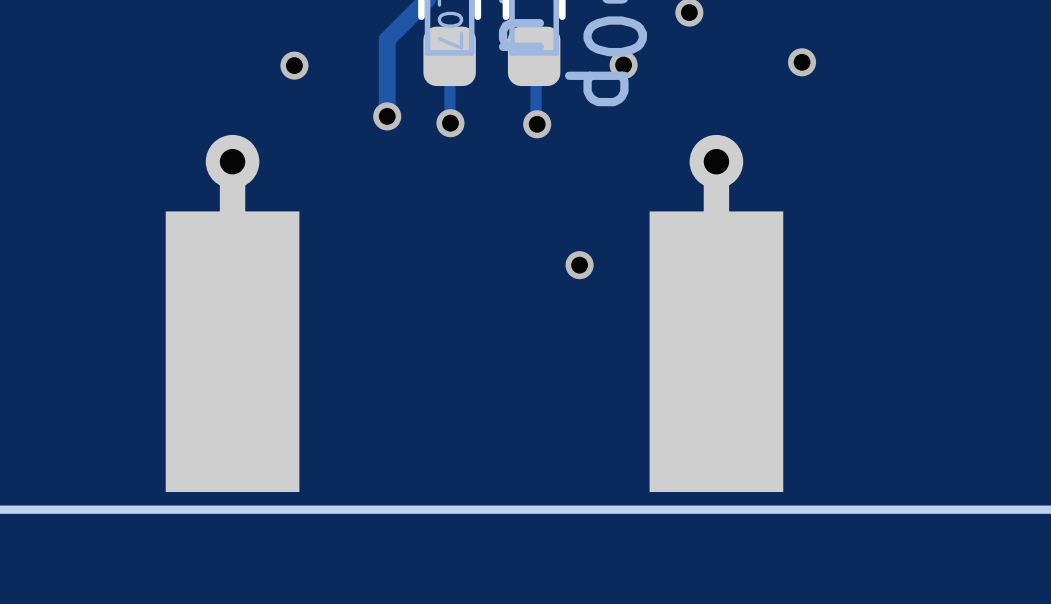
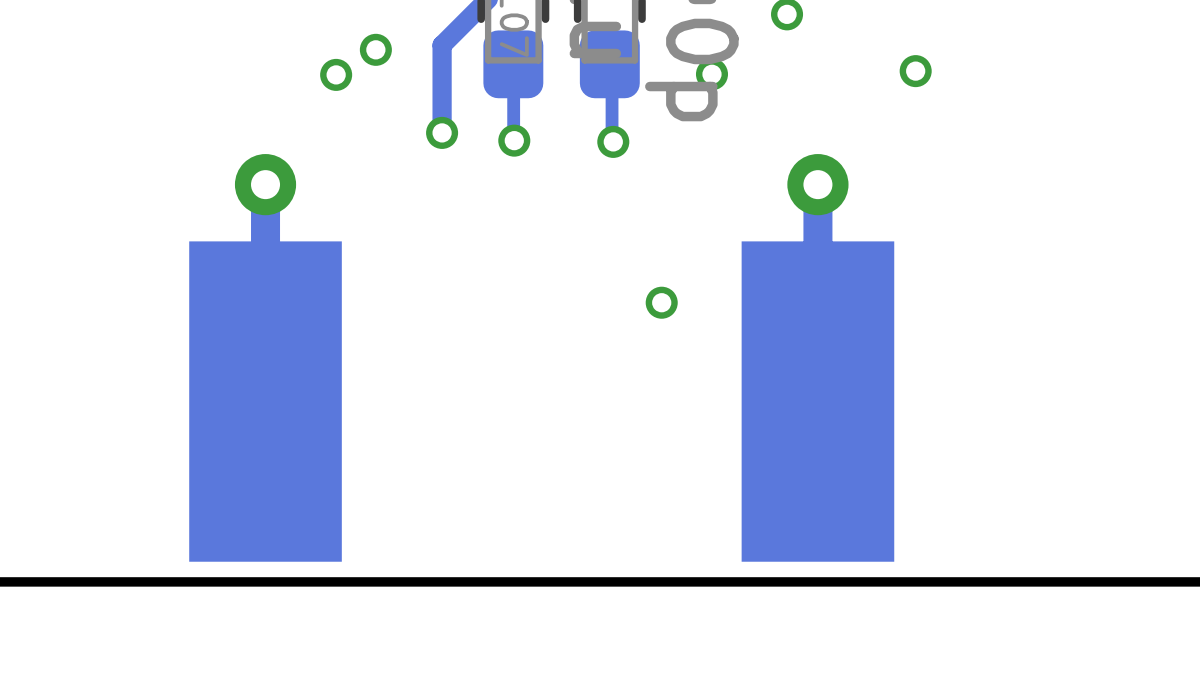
via: none -> (375, 49)

